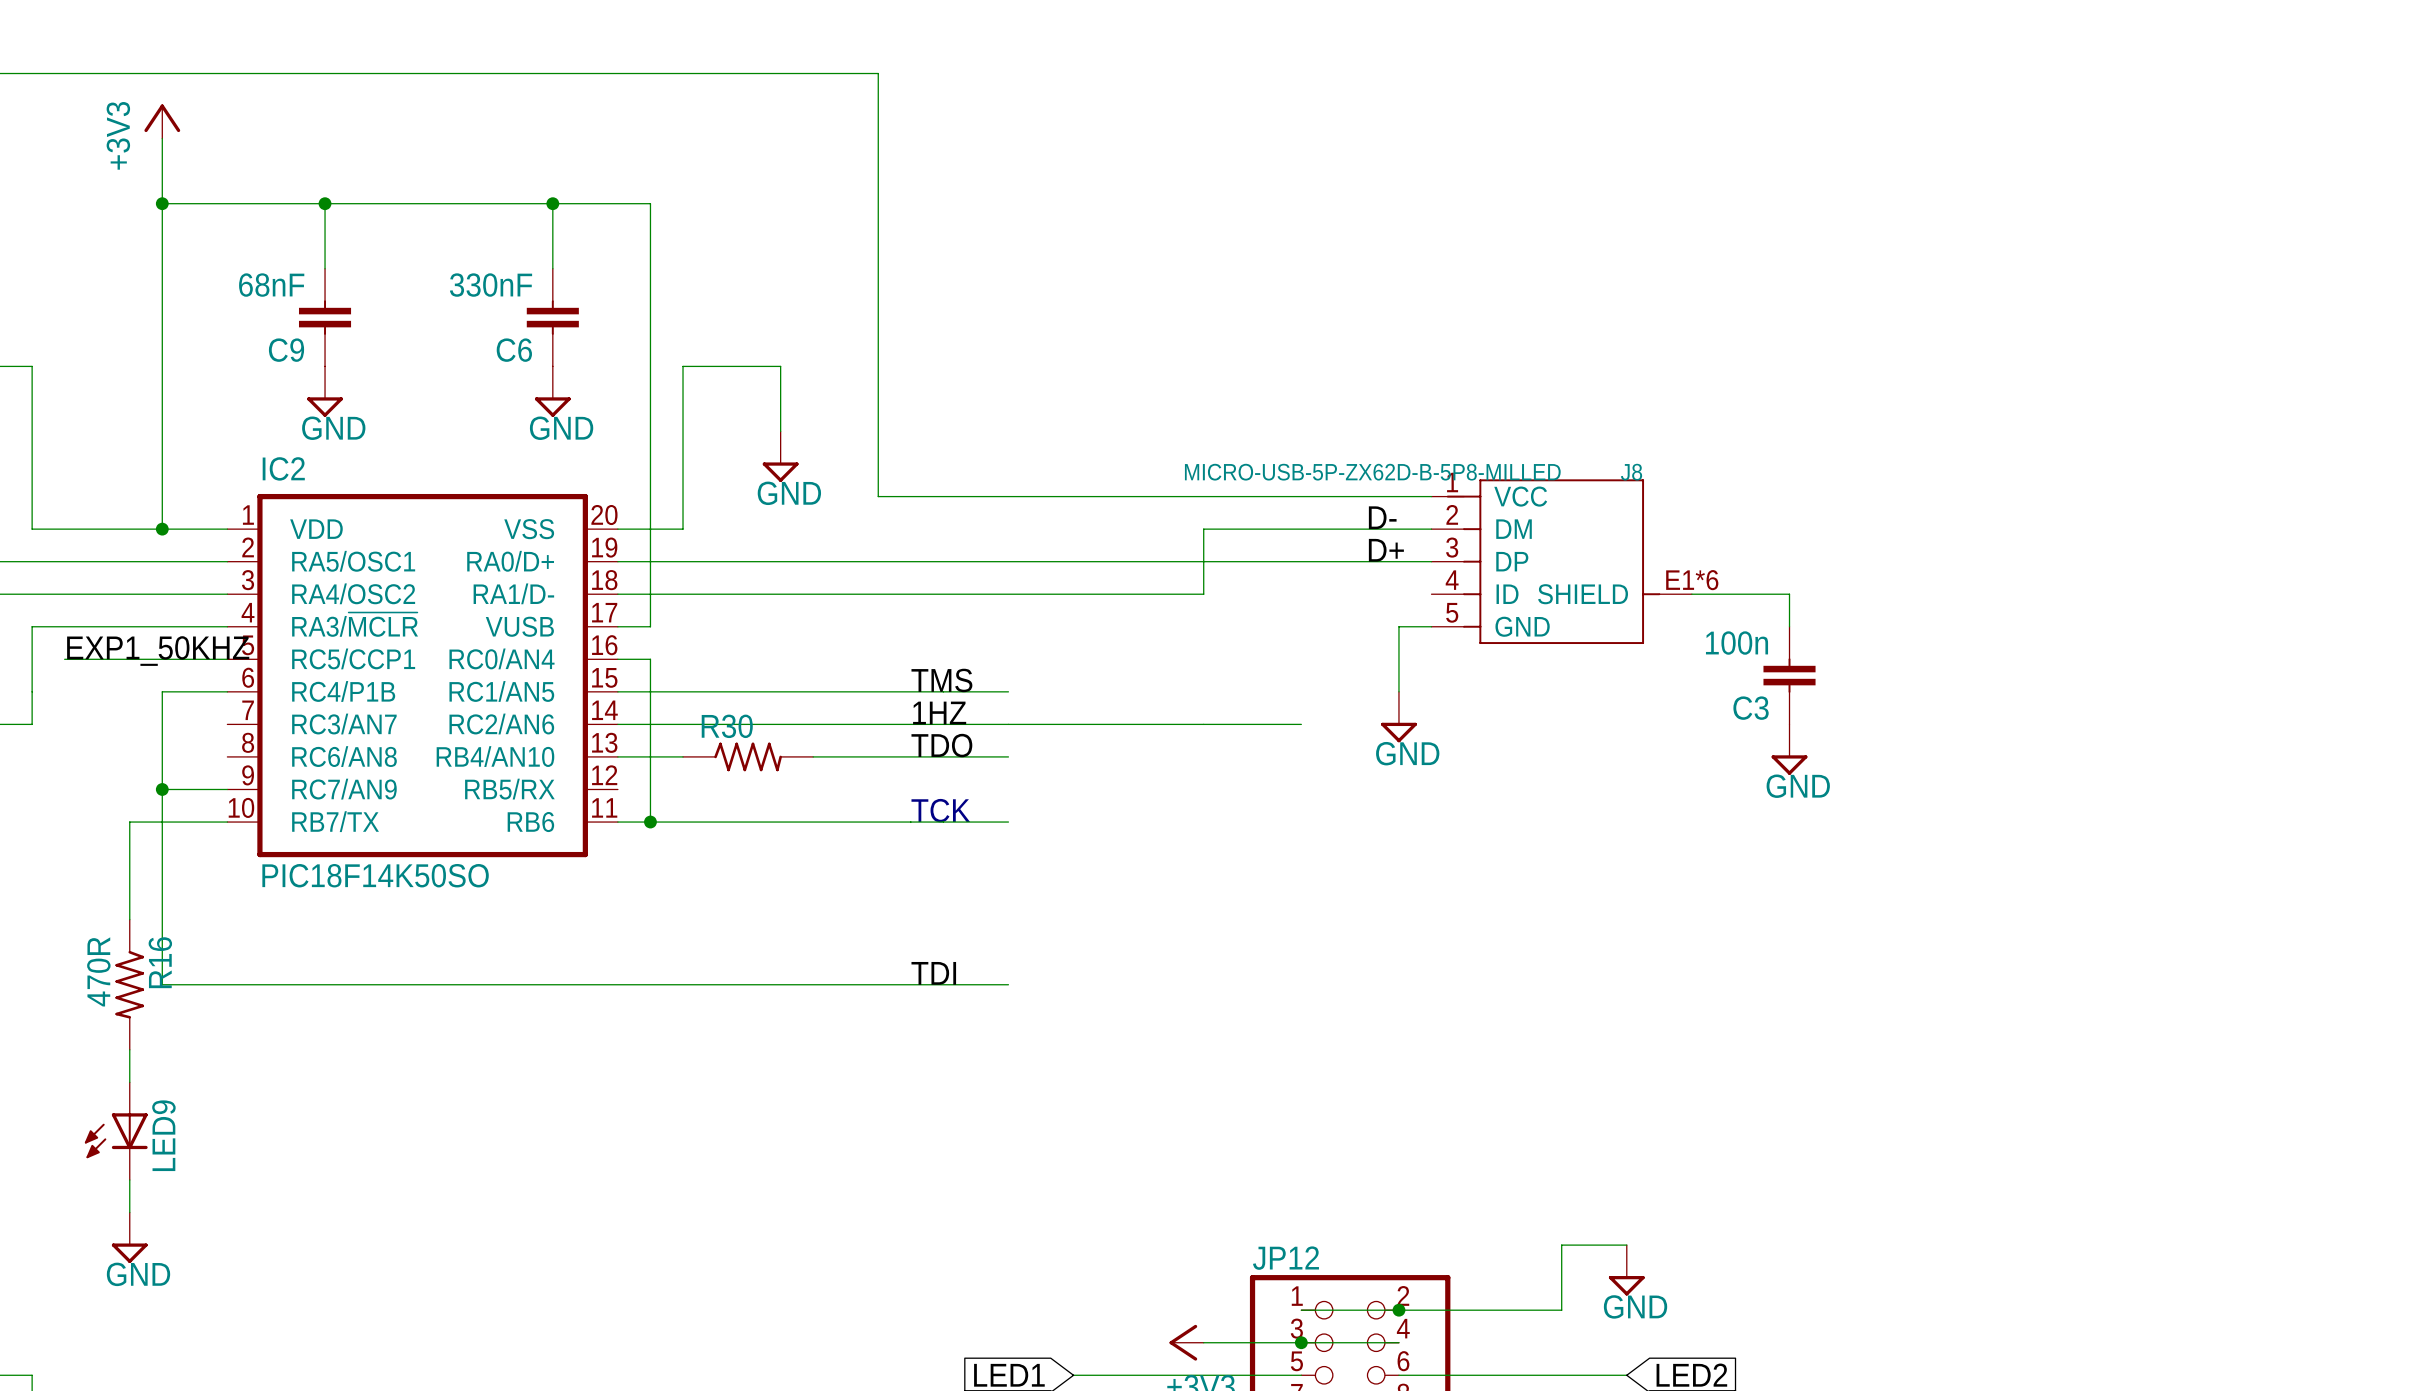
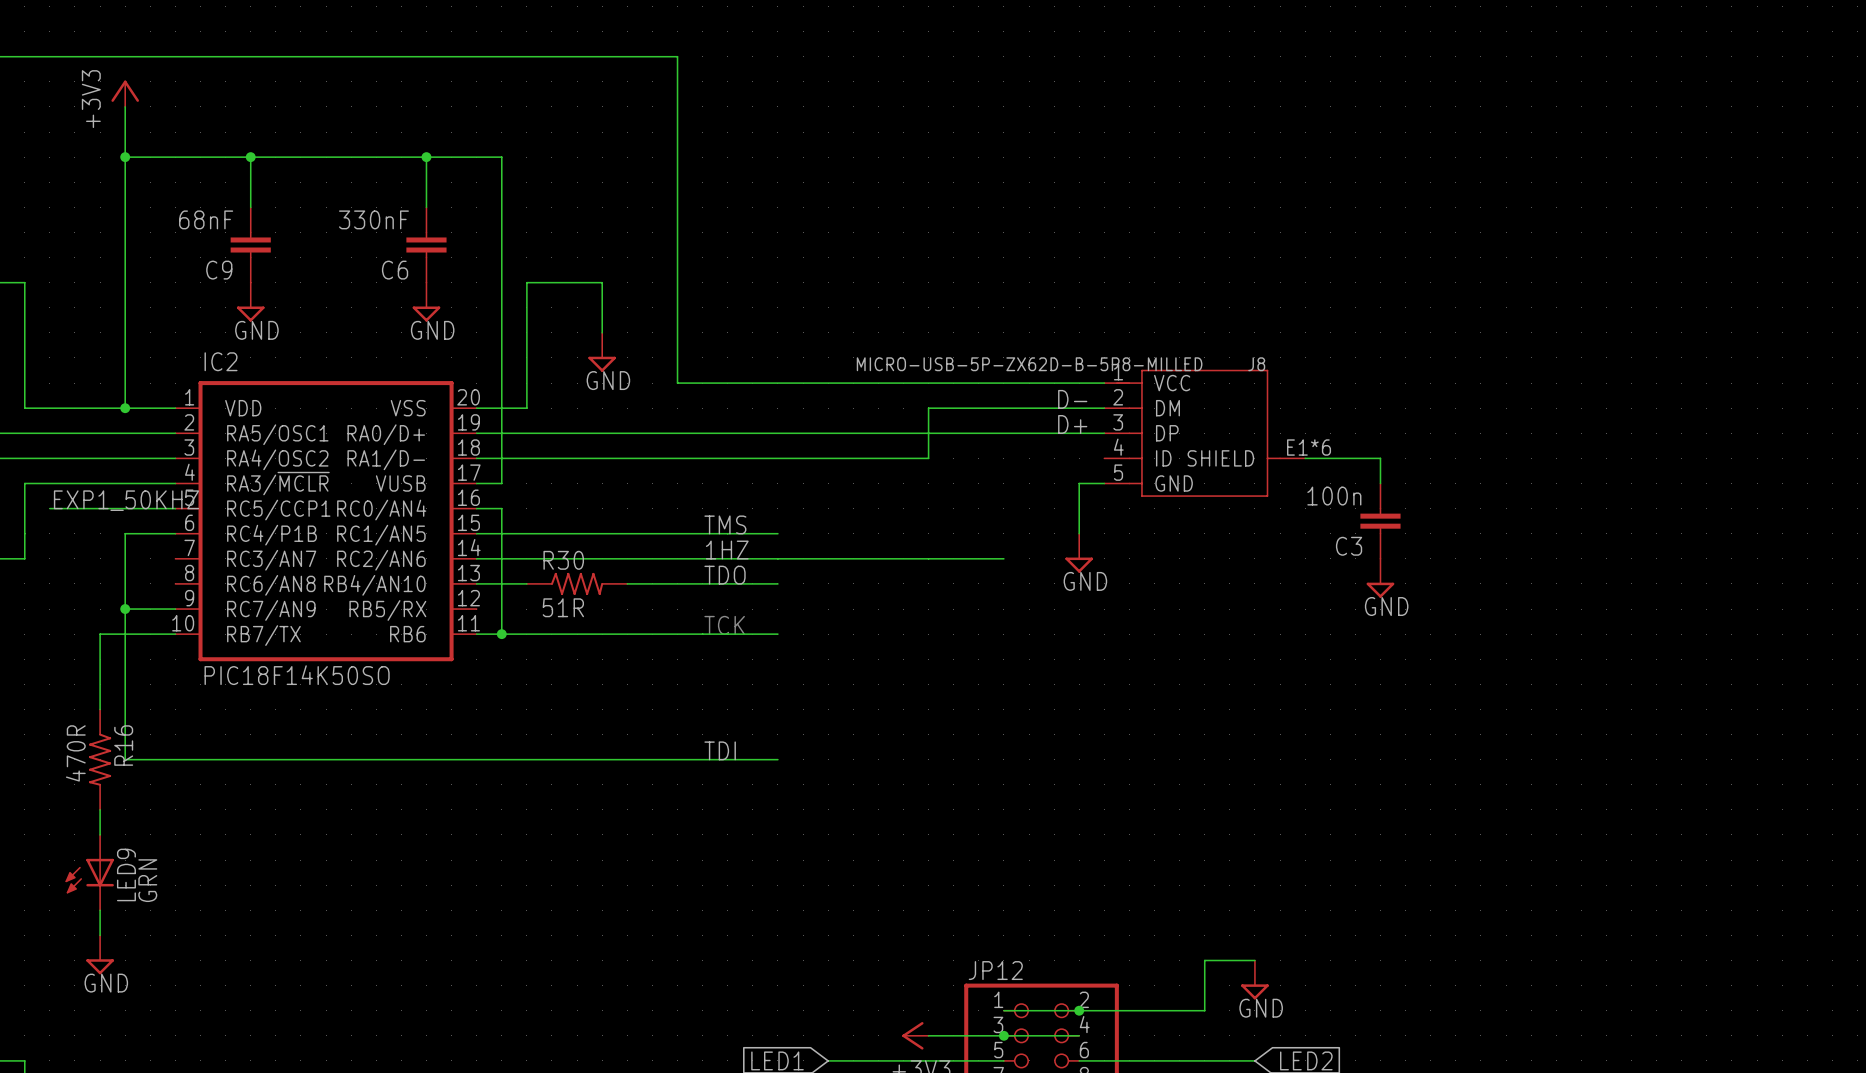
R30 value: none -> 51R (563, 607)
LED9 value: none -> GRN (147, 880)

